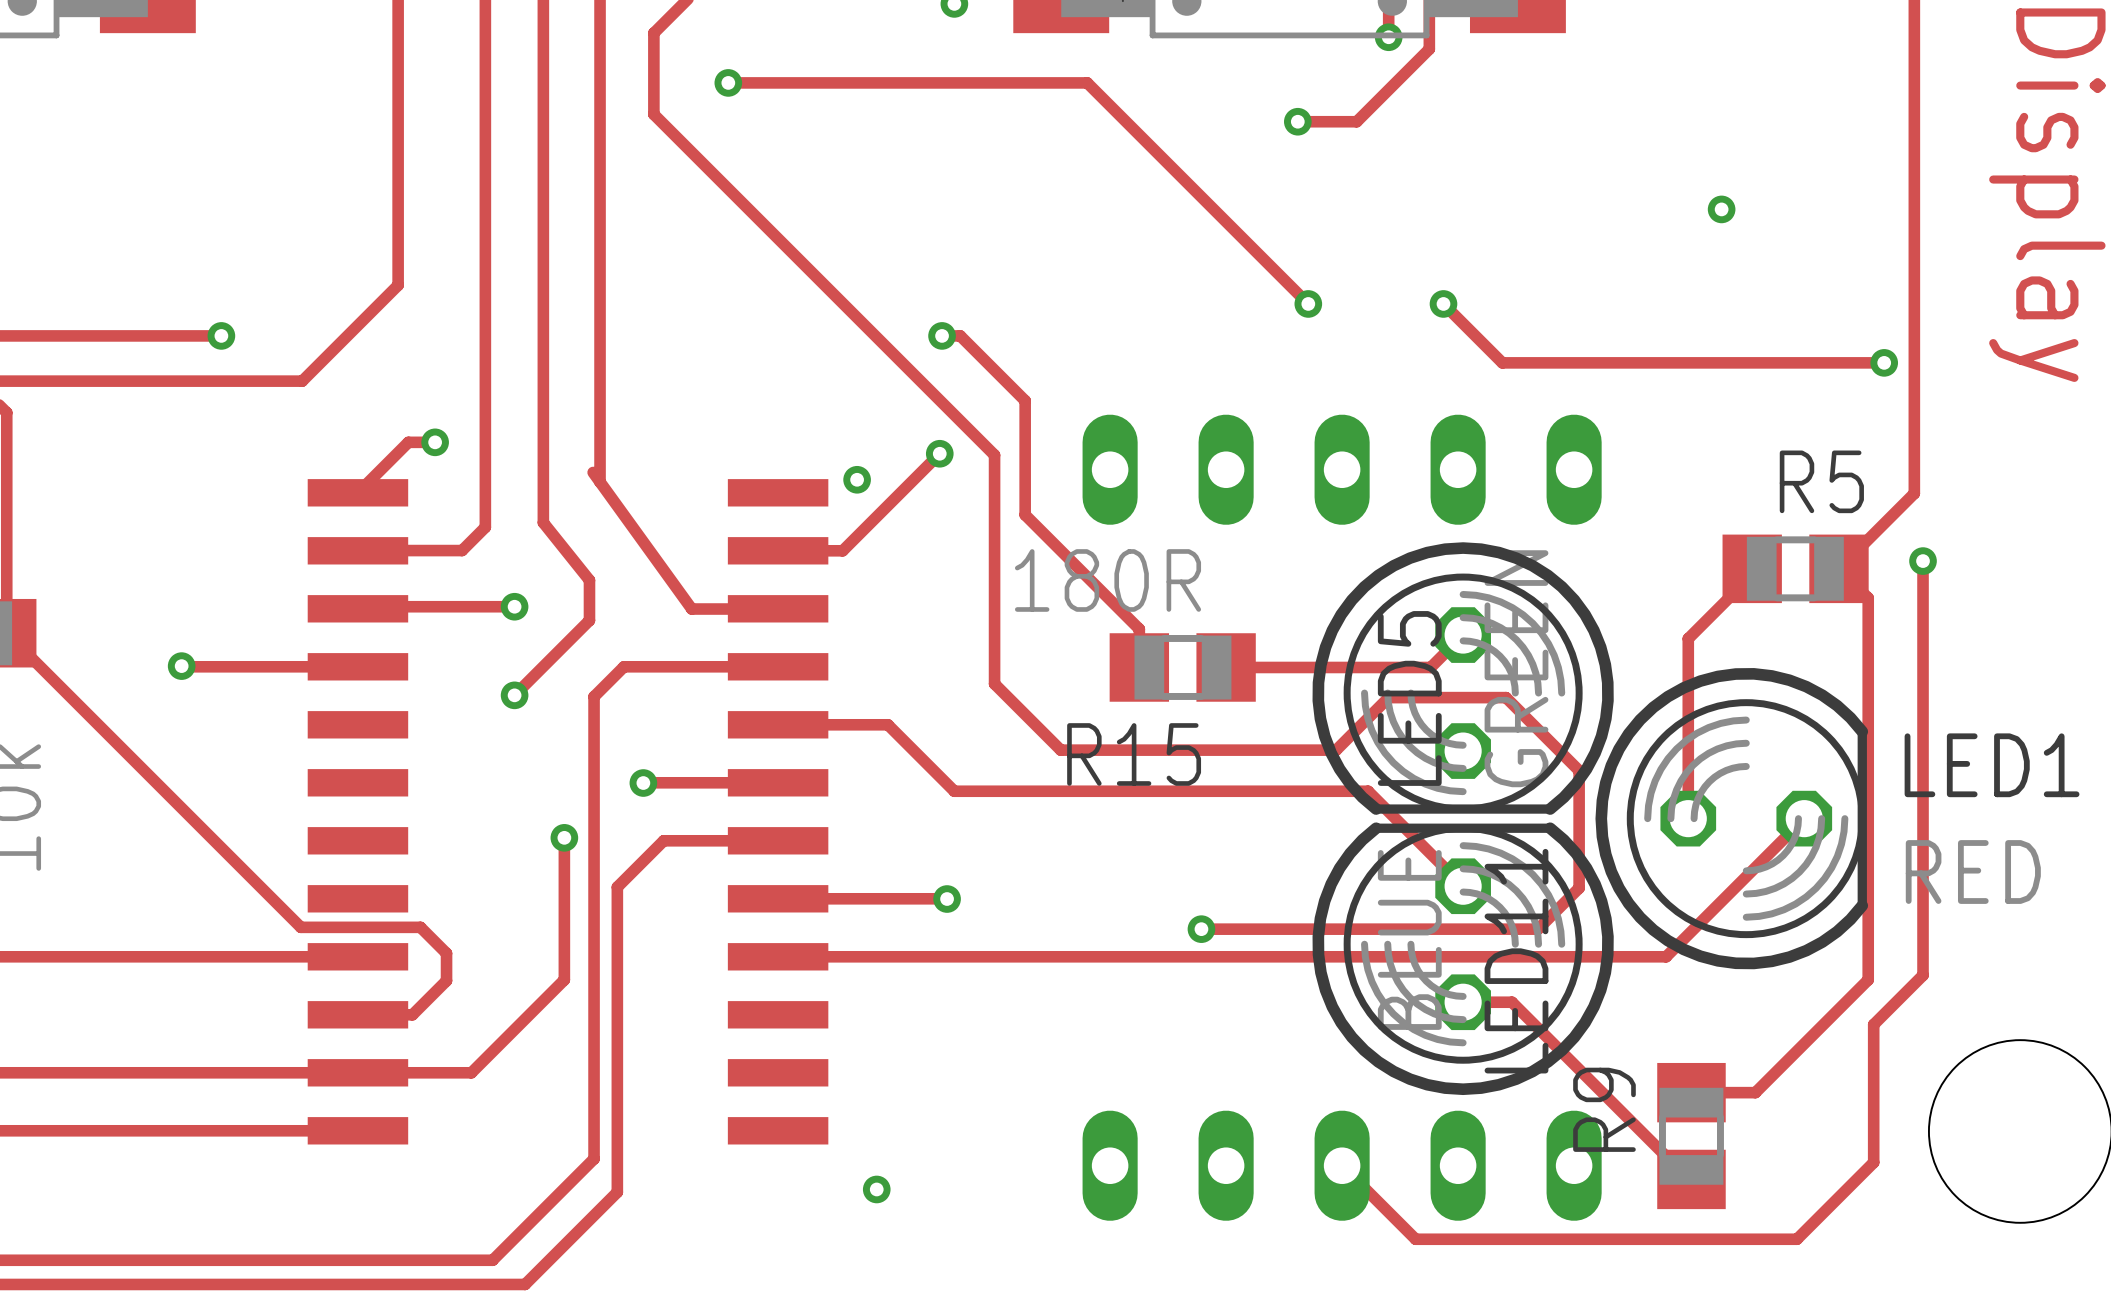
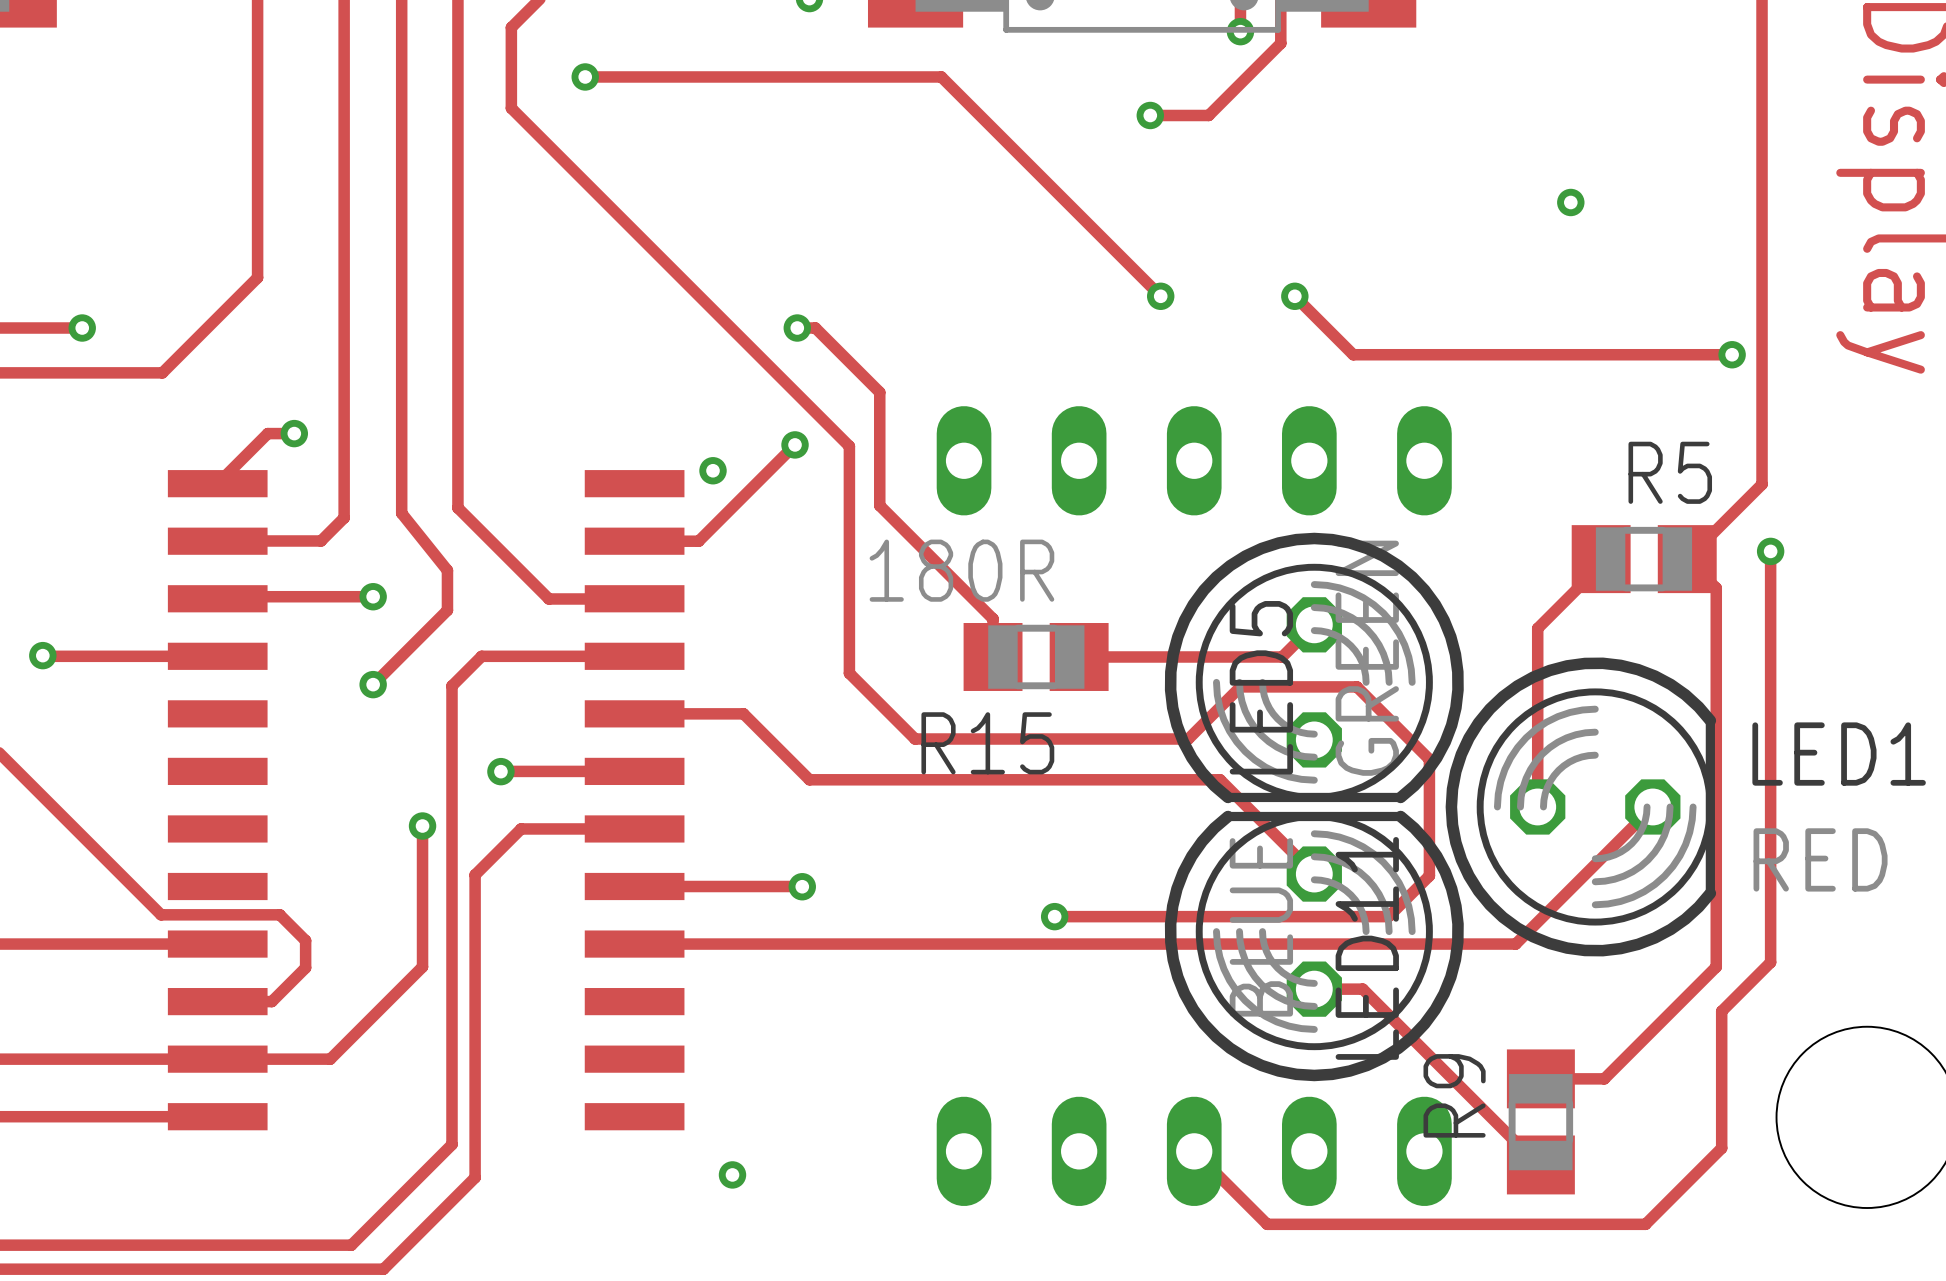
track: (593, 472) (691, 609) -> (457, 472) (457, 507) (548, 598)

